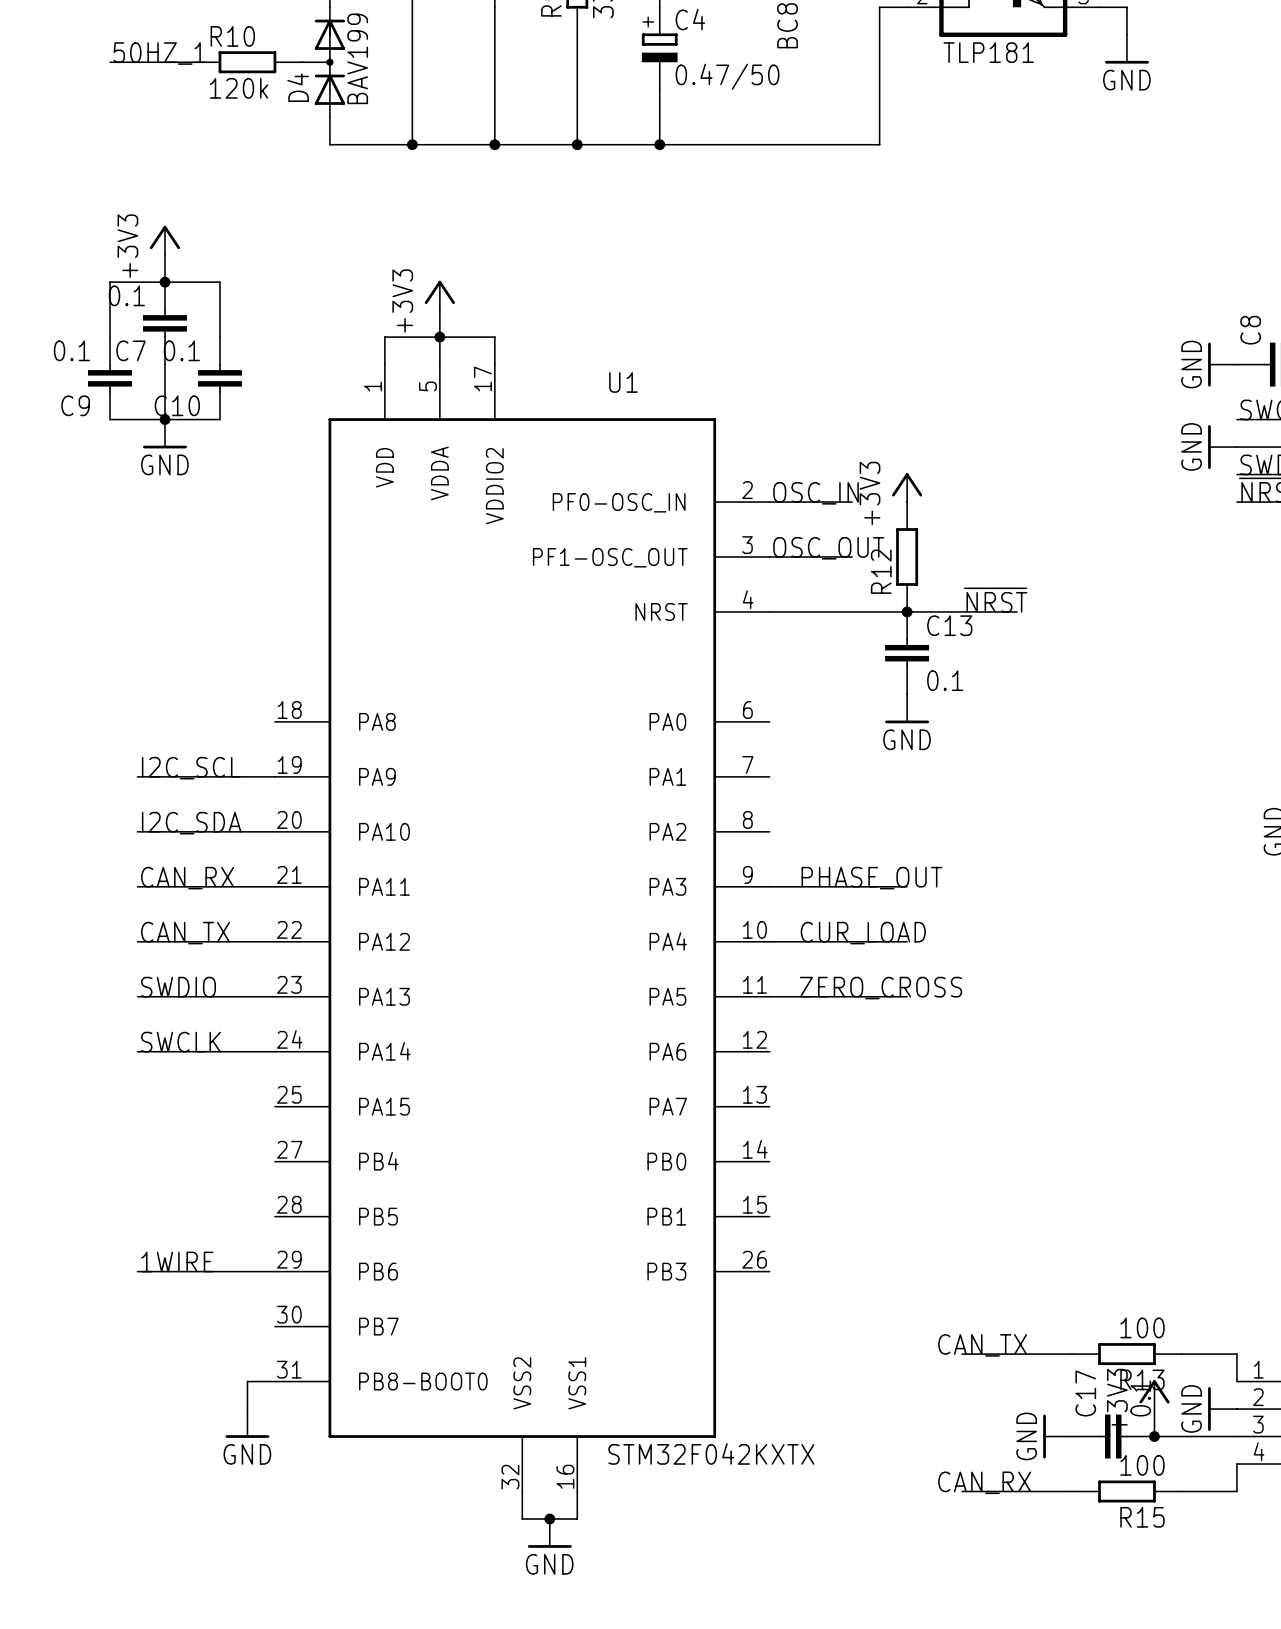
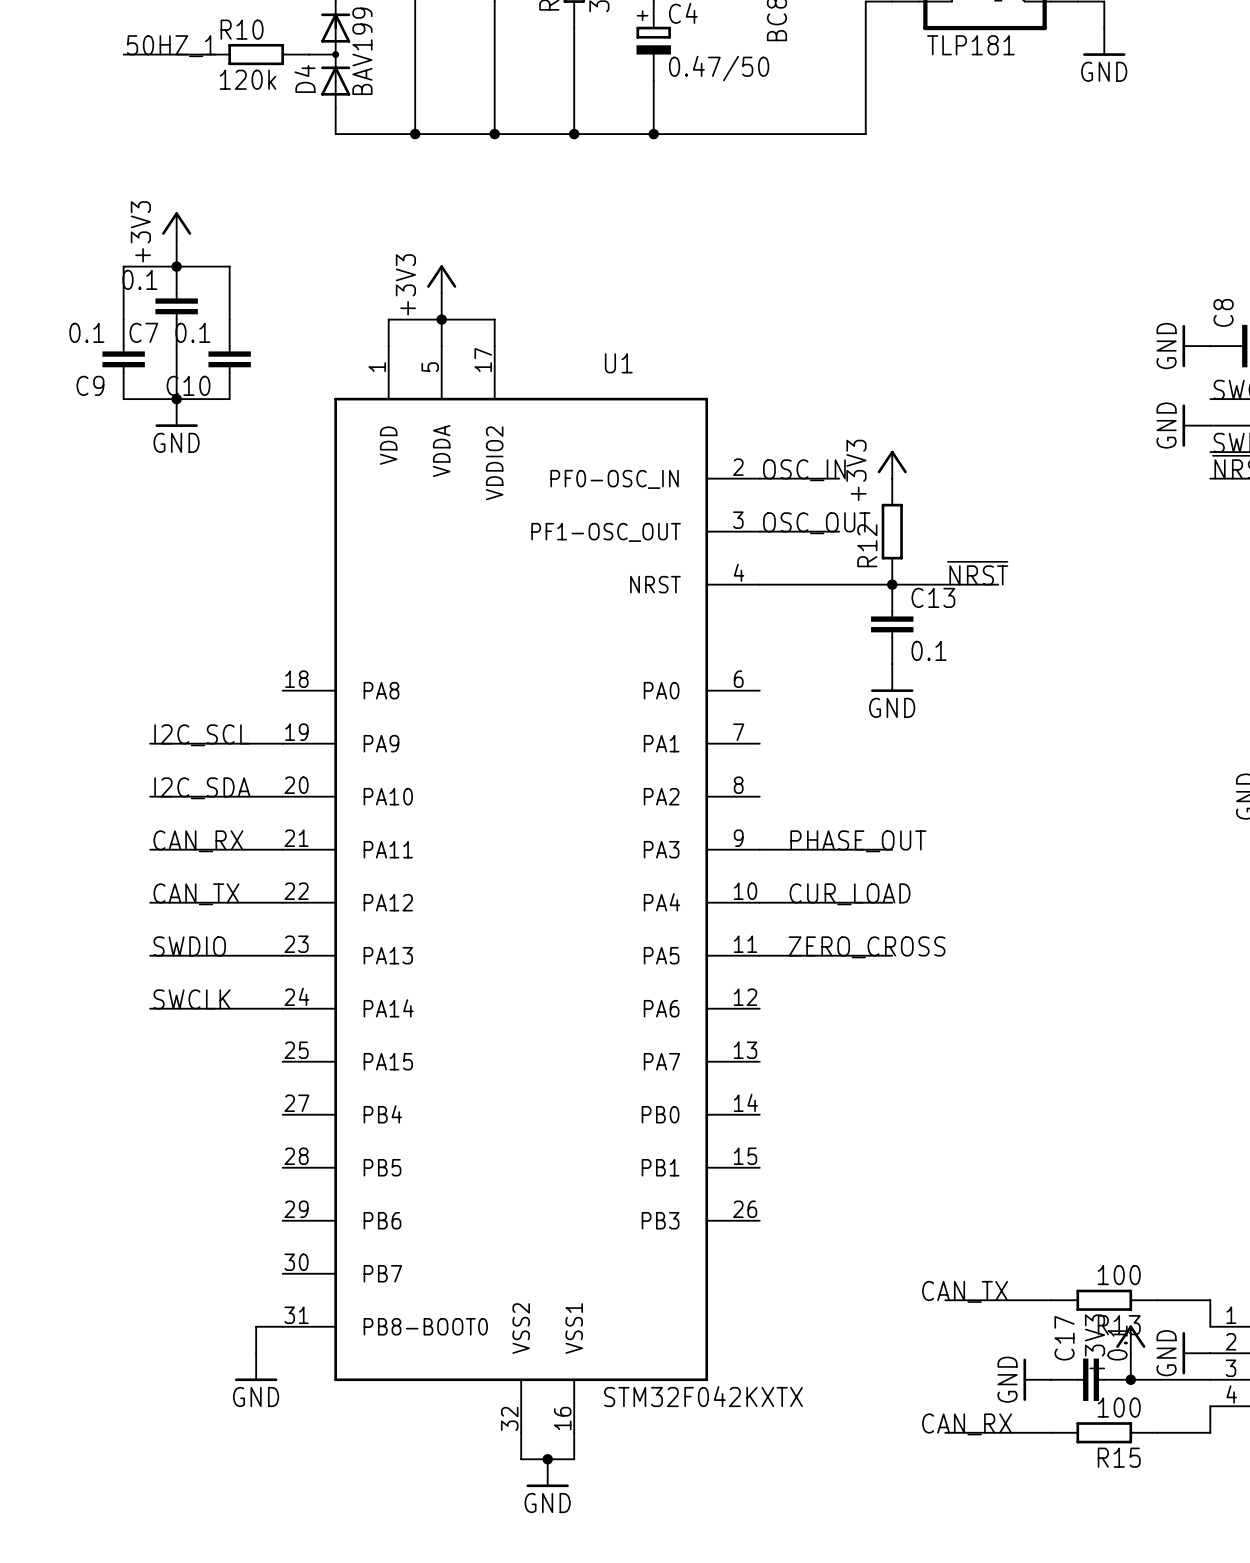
label: 1WIRE (177, 1261) -> none
wire: (137, 1271) (274, 1271) -> none

